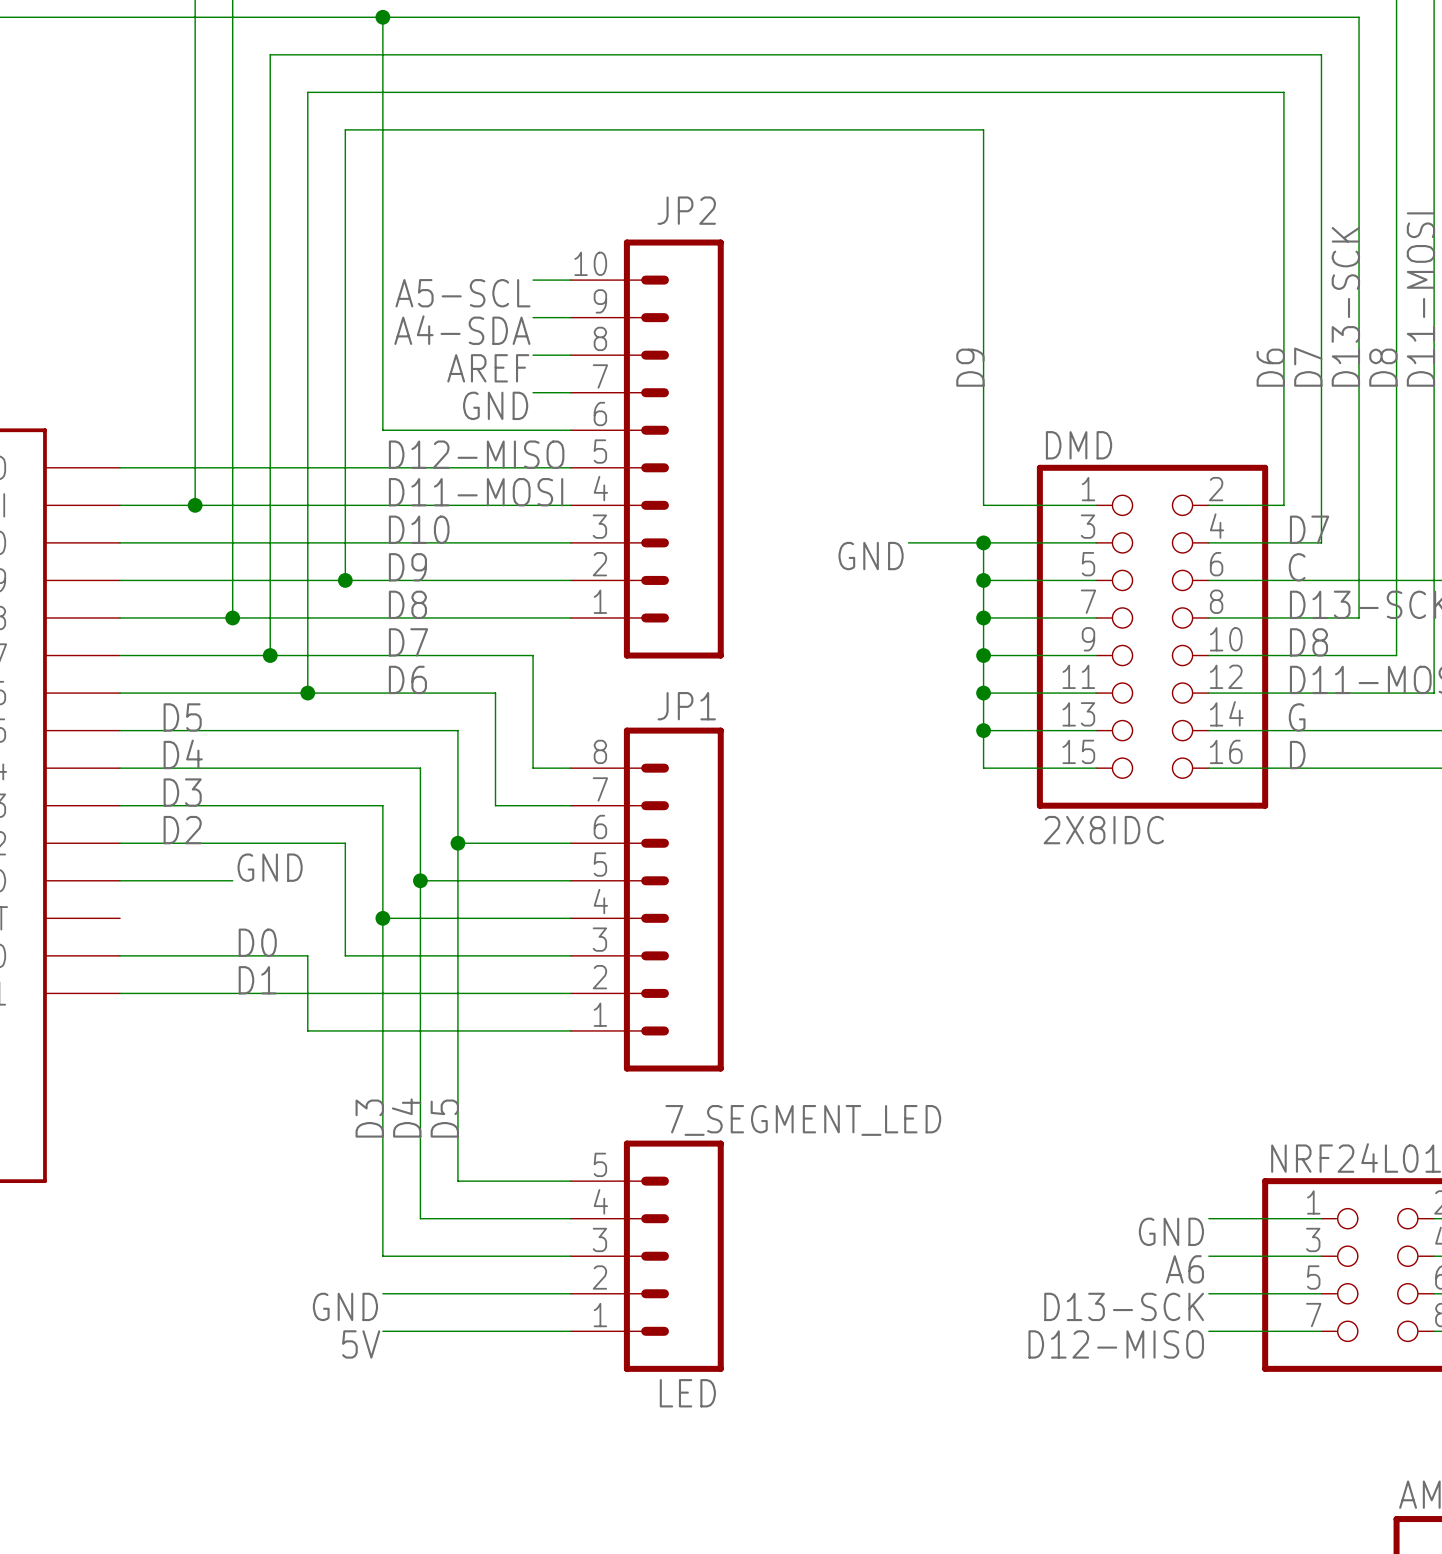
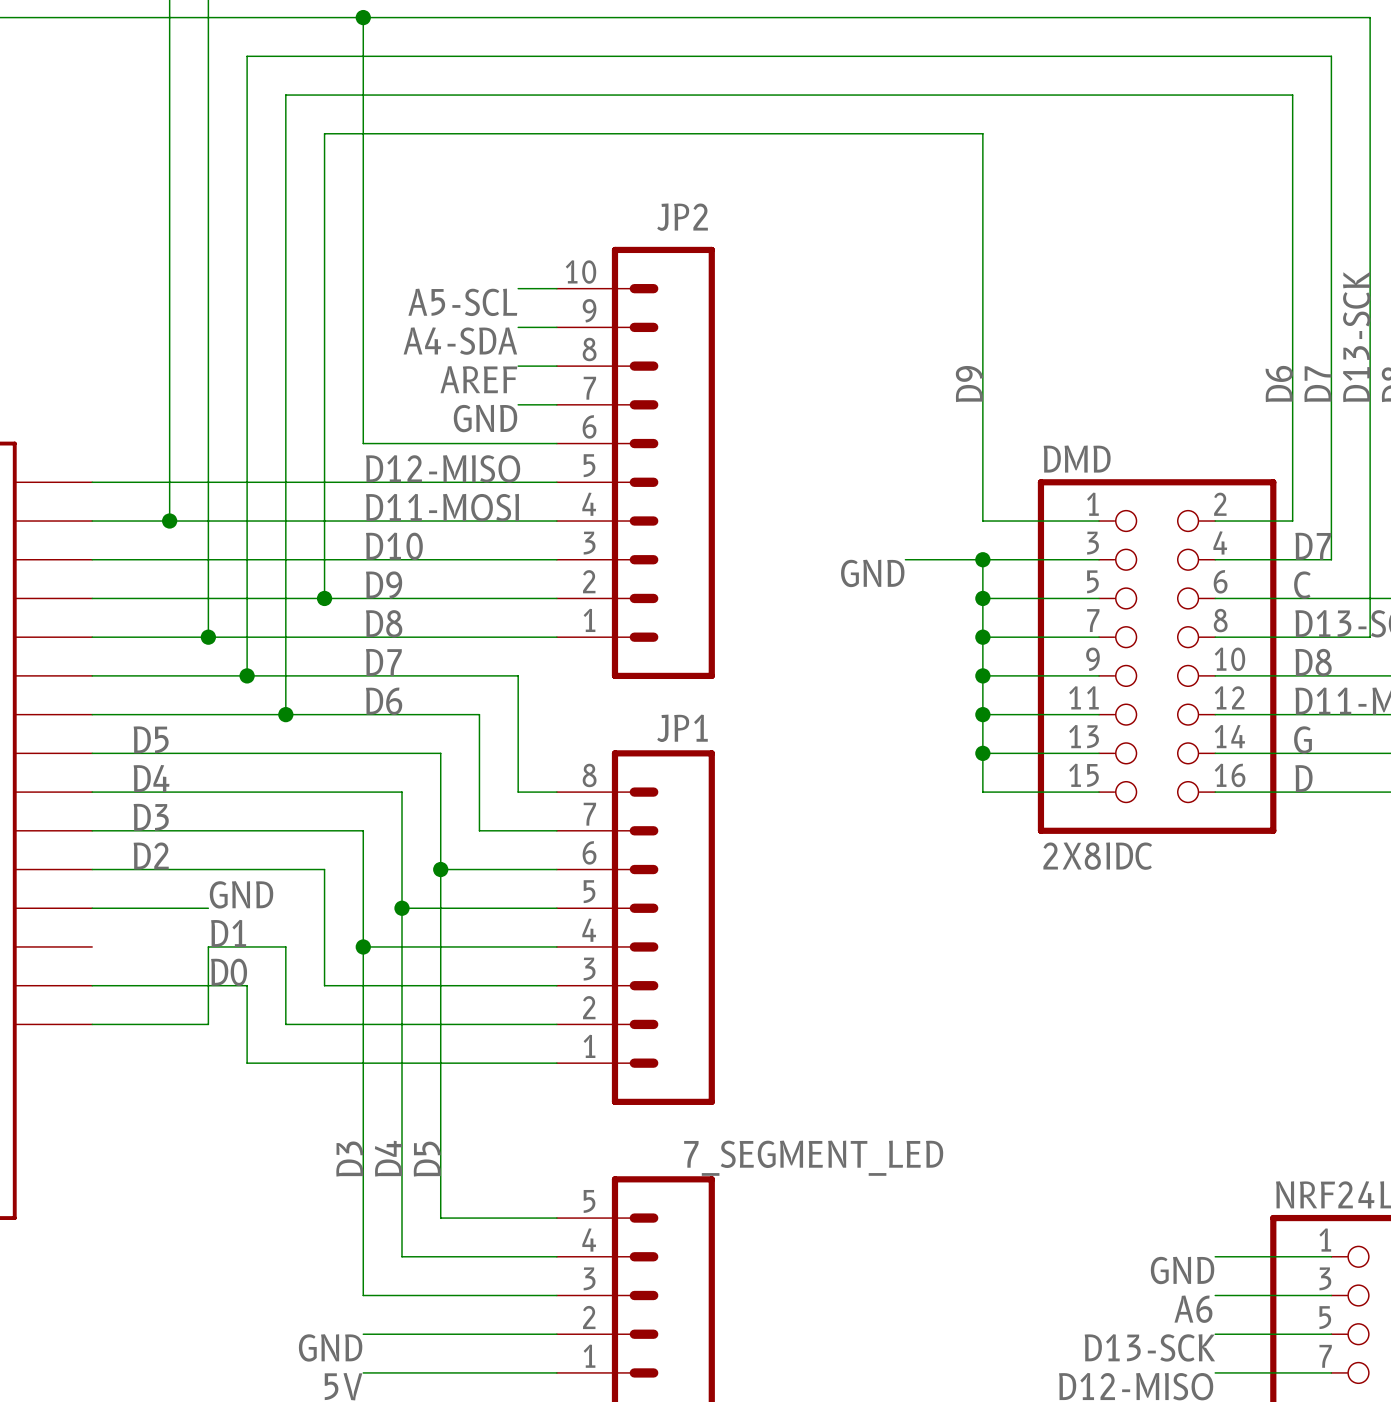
wire: (270, 955) (307, 955) -> (208, 1024) (208, 946) (285, 946) (285, 985)
label position: D1 (257, 980) -> D1 (228, 933)
wire: (232, 993) (307, 993) (307, 1030) -> (247, 985) (247, 1063) (285, 1063)

